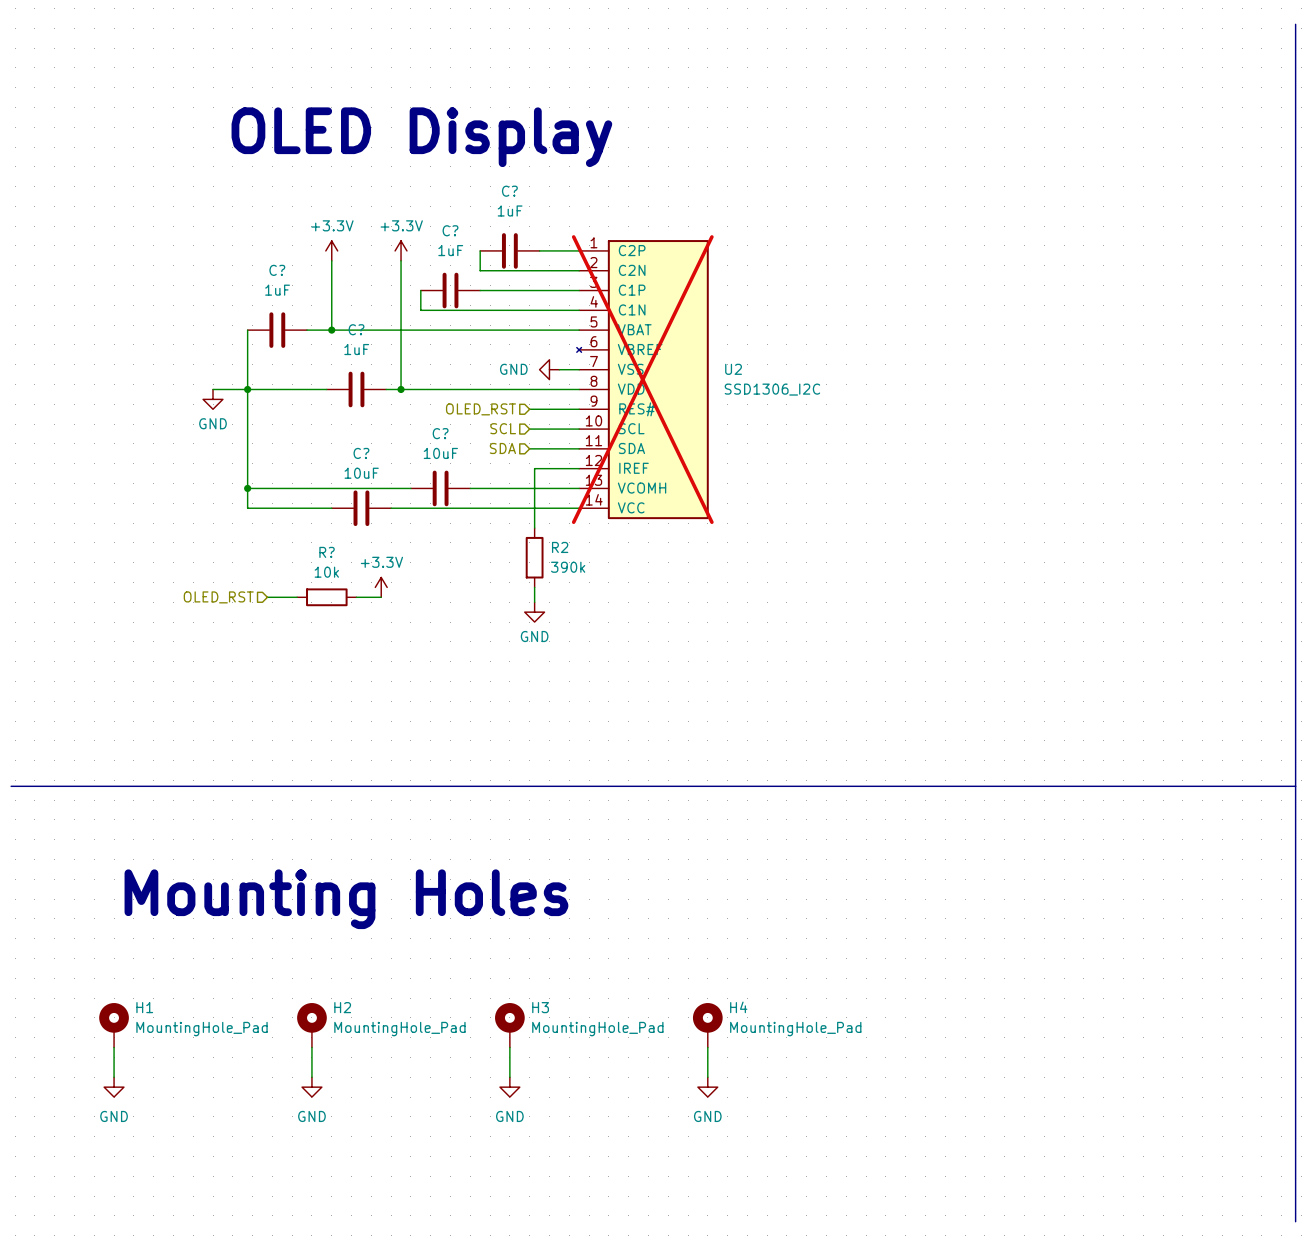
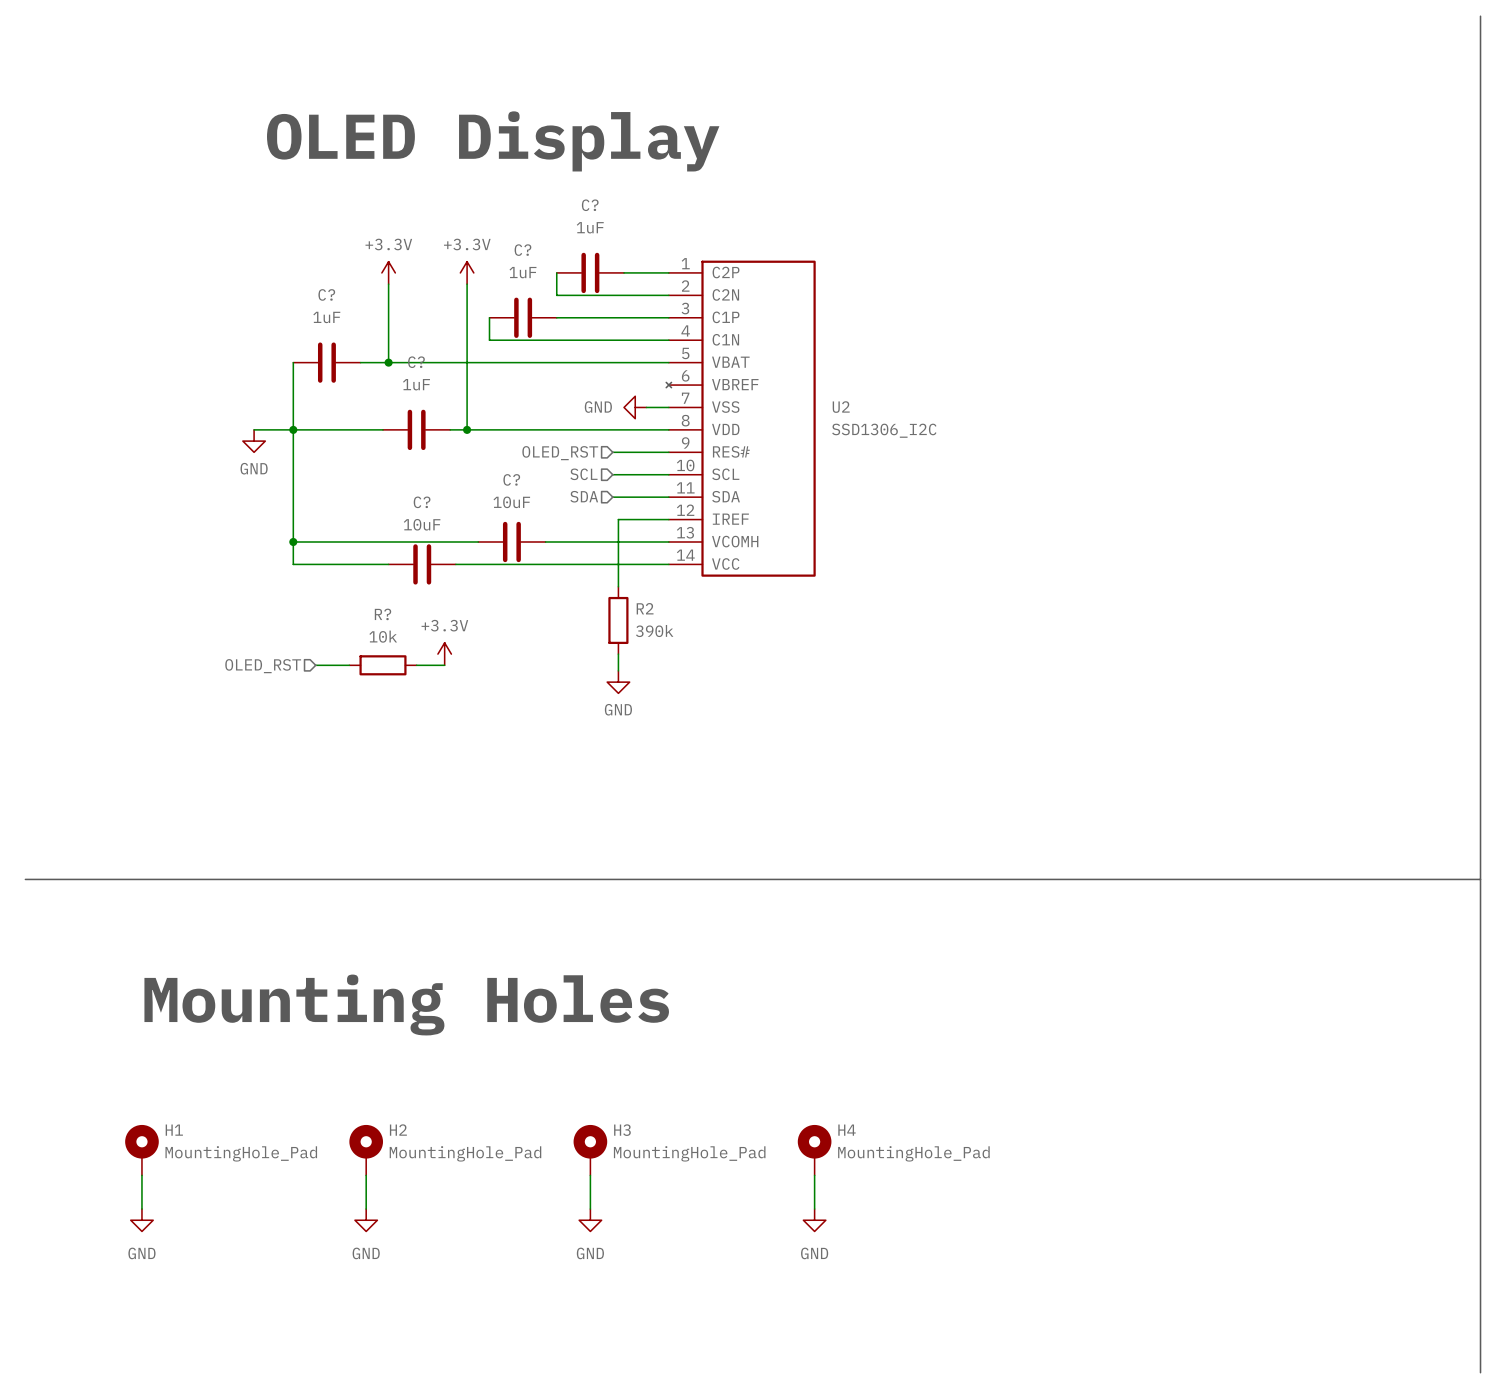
U2 do-not-place cross: (642, 379) -> none

